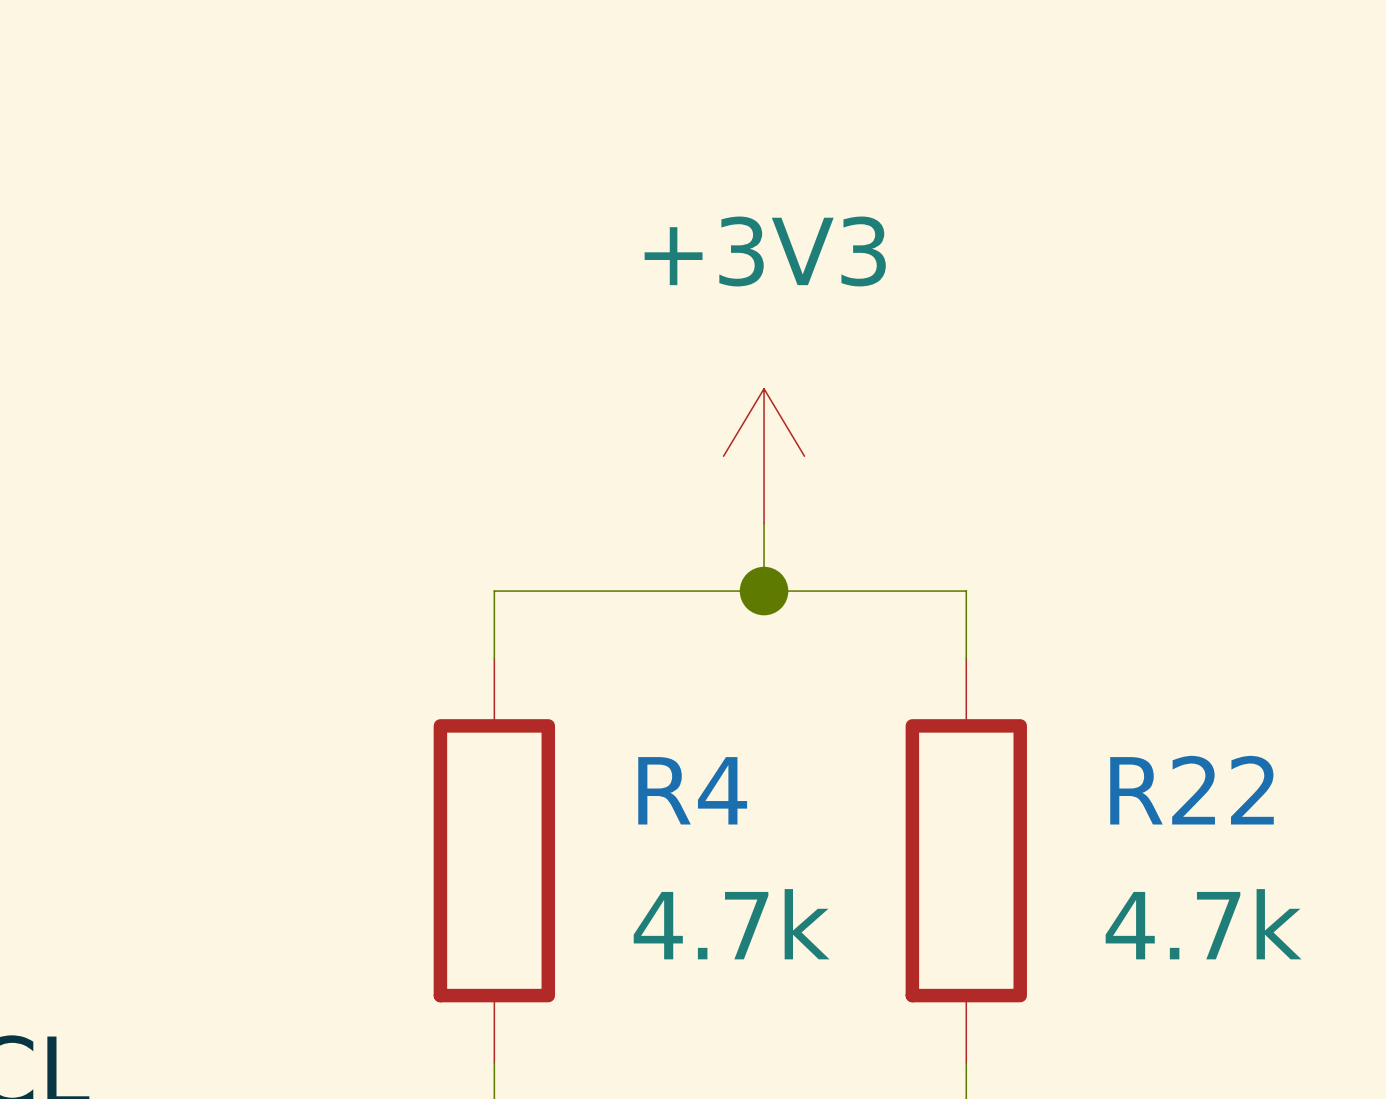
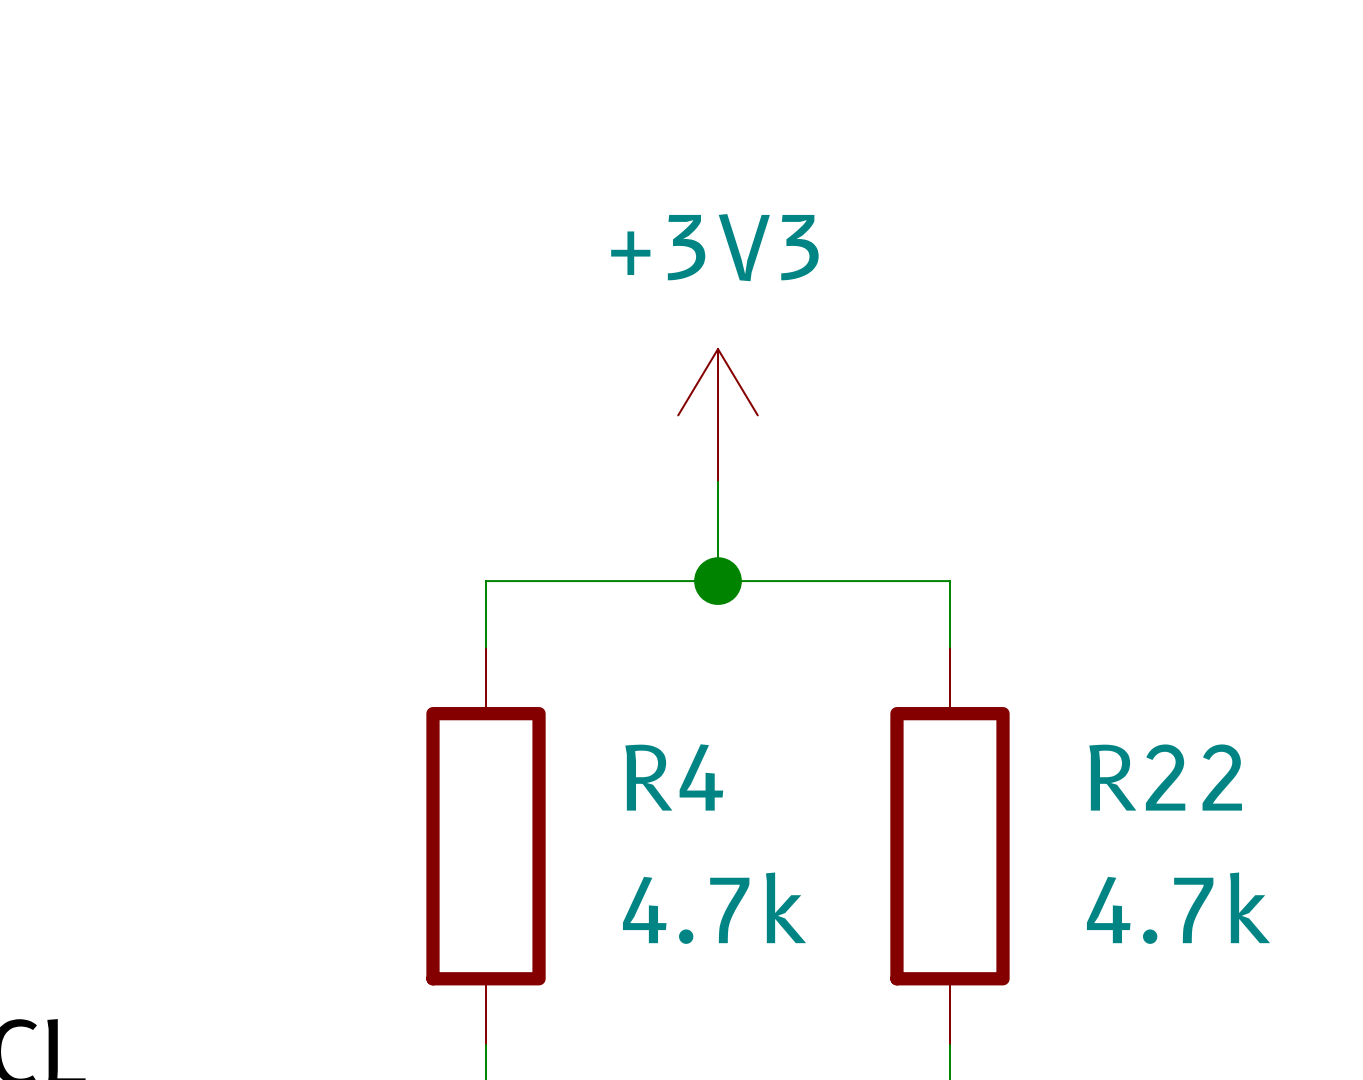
power symbol text position: +3V3 (765, 251) -> +3V3 (714, 247)
power symbol position: +3V3 (764, 456) -> +3V3 (718, 415)
wire: none -> (718, 481) (718, 581)
wire: (764, 523) (764, 591) -> none
junction position: (764, 591) -> (718, 581)

